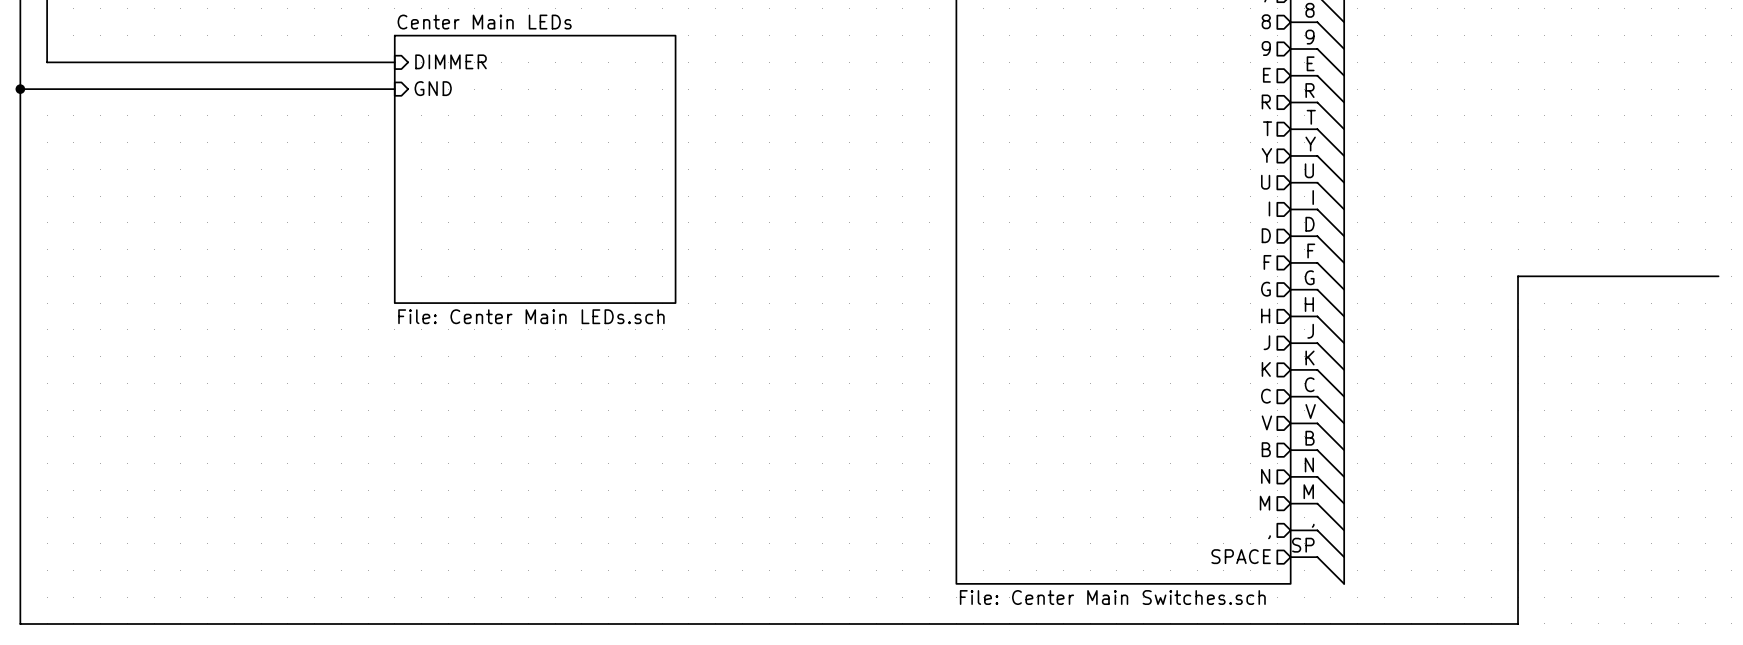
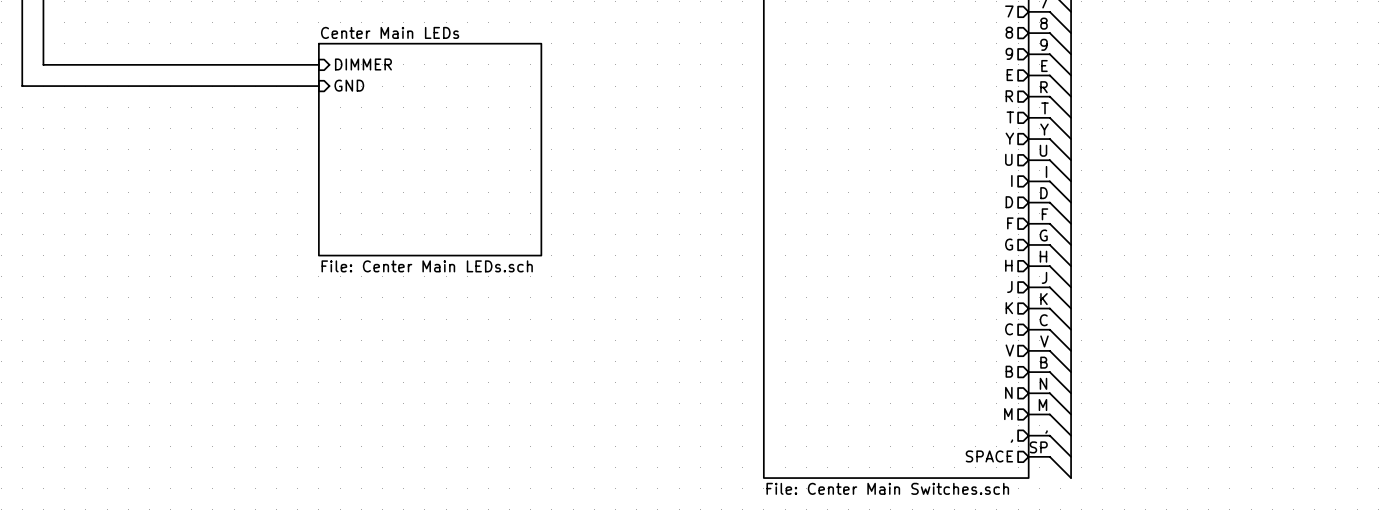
wire: (20, 89) (20, 623) (1518, 623) (1518, 276) (1718, 276) -> none
junction: (20, 89) -> none

